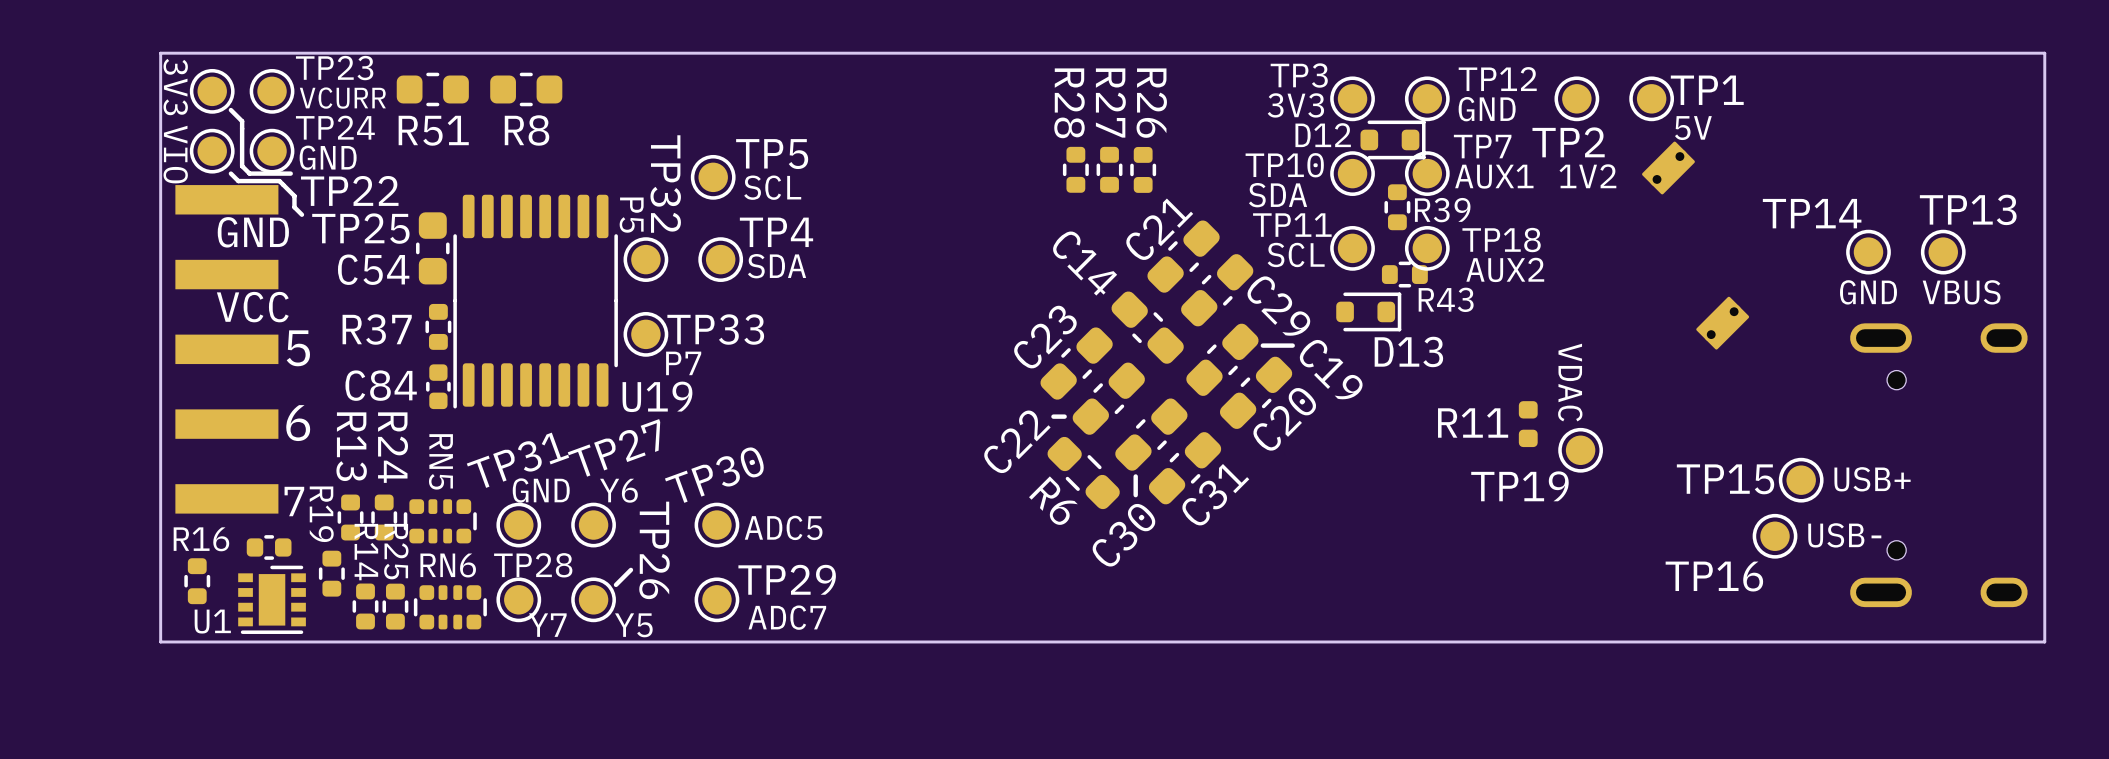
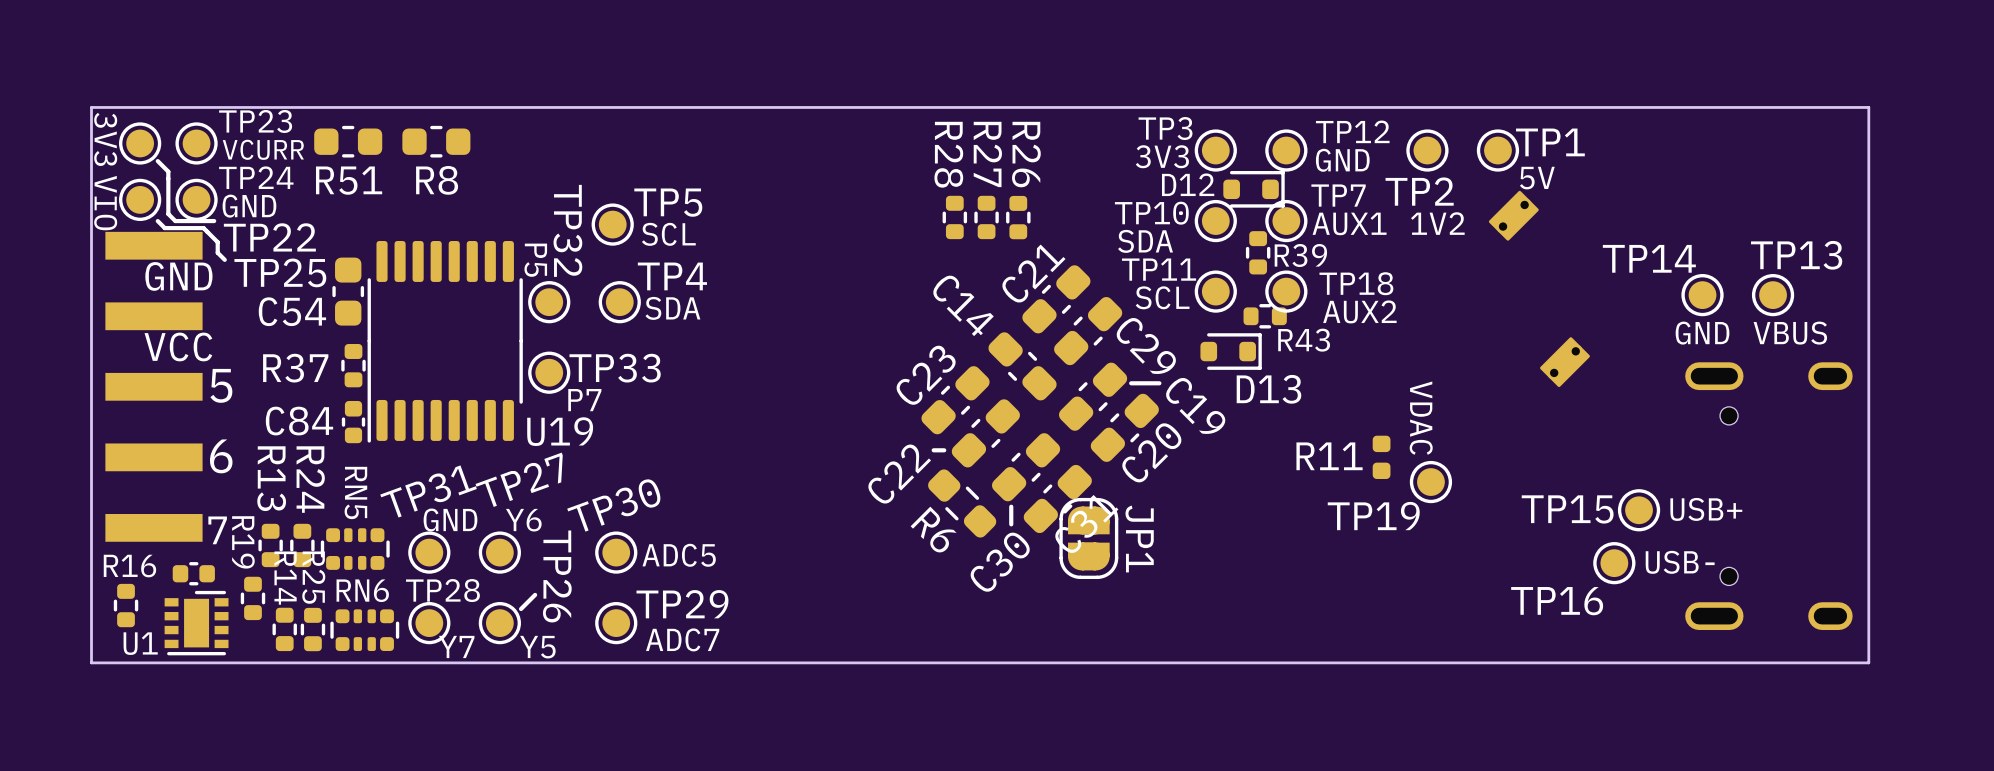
JP1: none -> (1088, 538)

